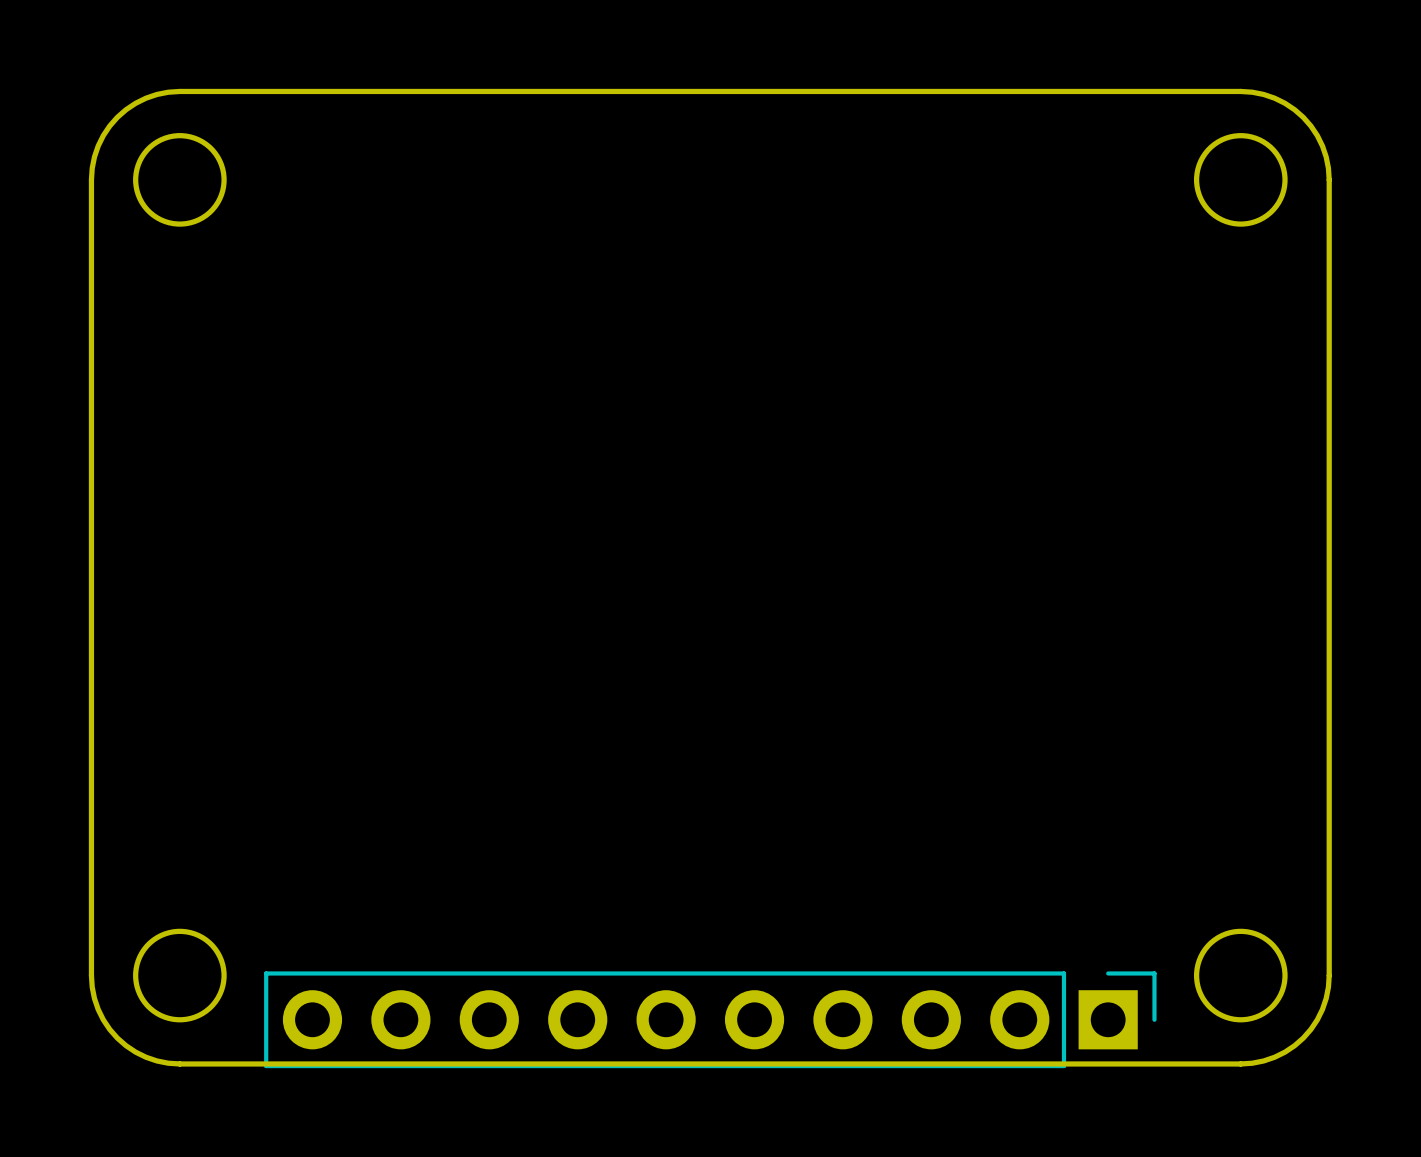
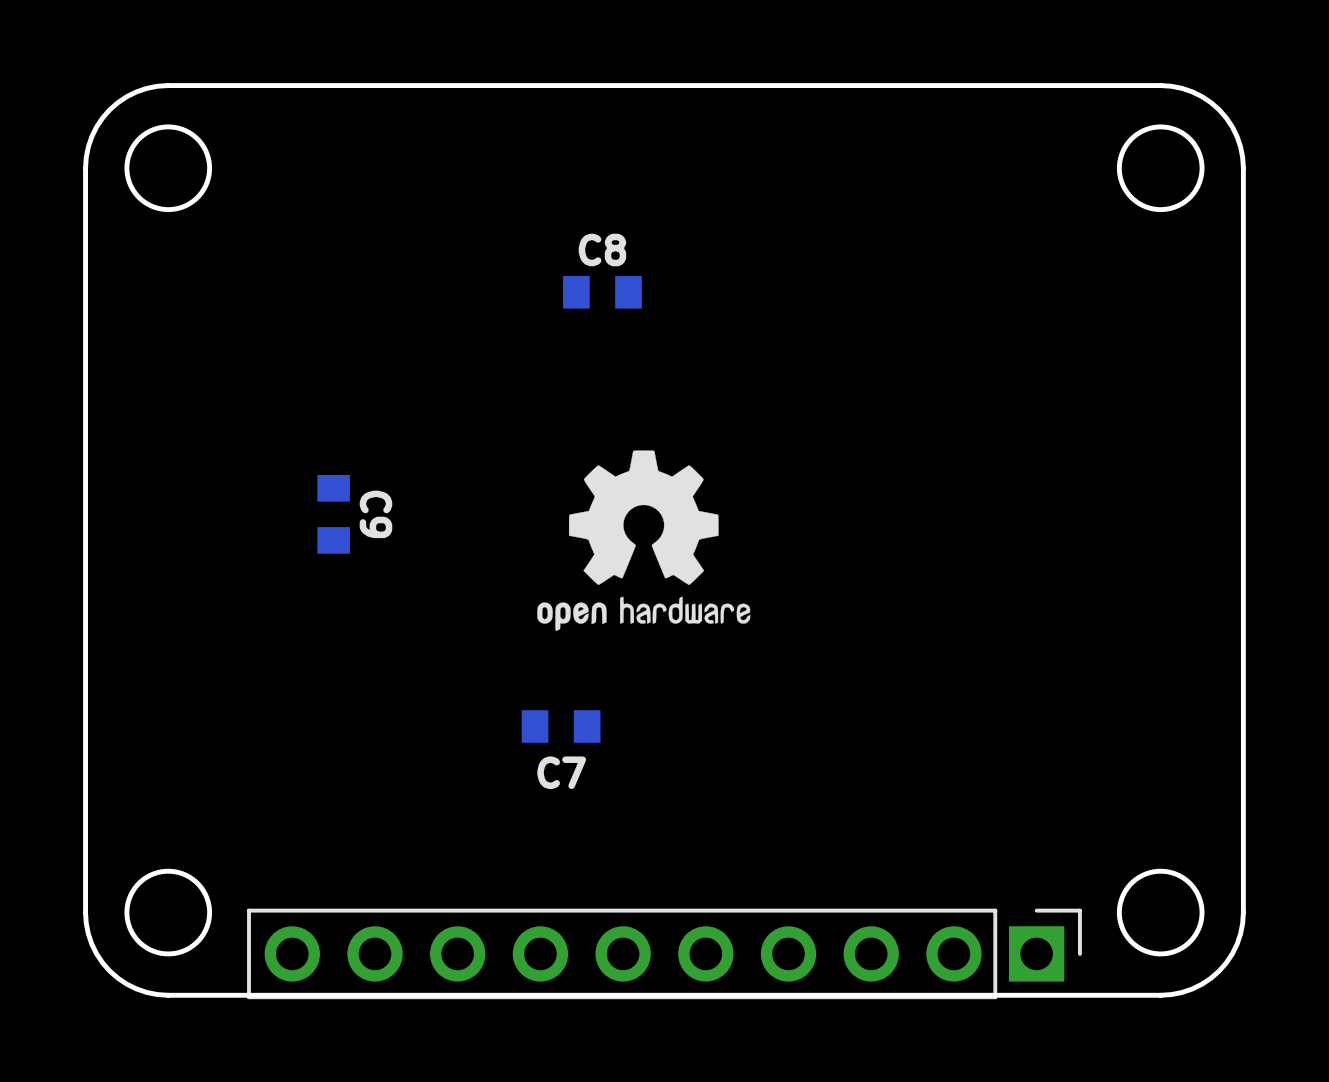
C8: none -> (602, 292)
drawing: none -> [537, 450, 751, 631]
C9: none -> (333, 514)
C7: none -> (561, 726)

